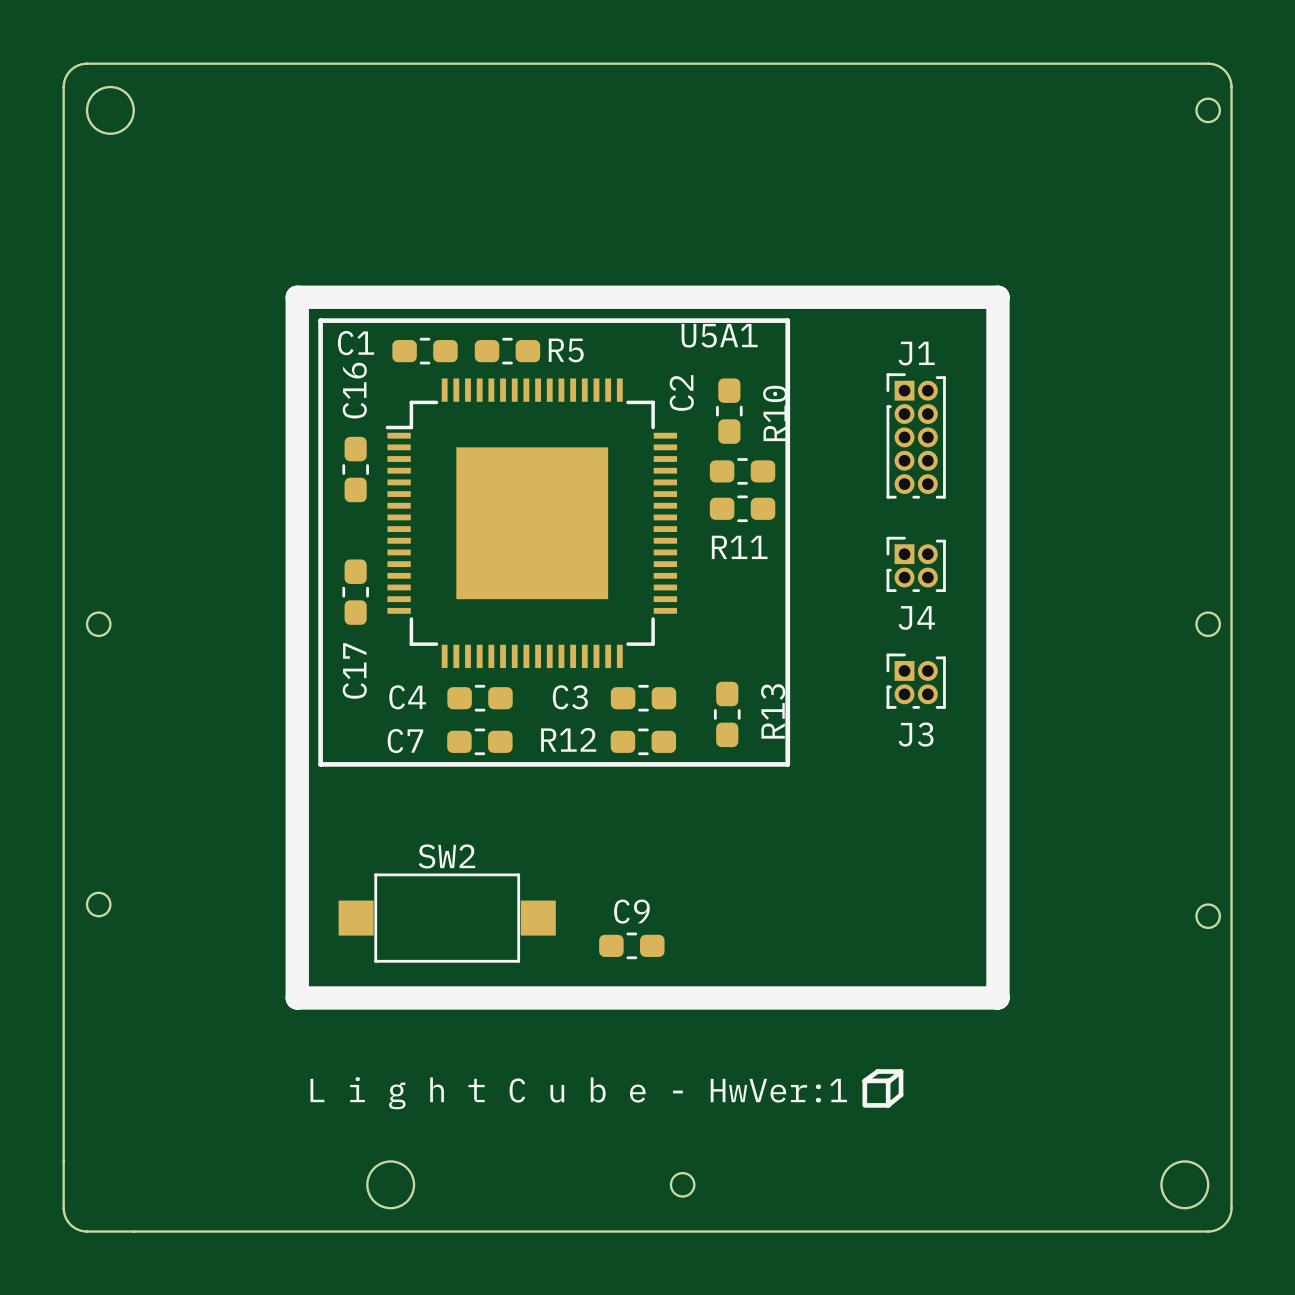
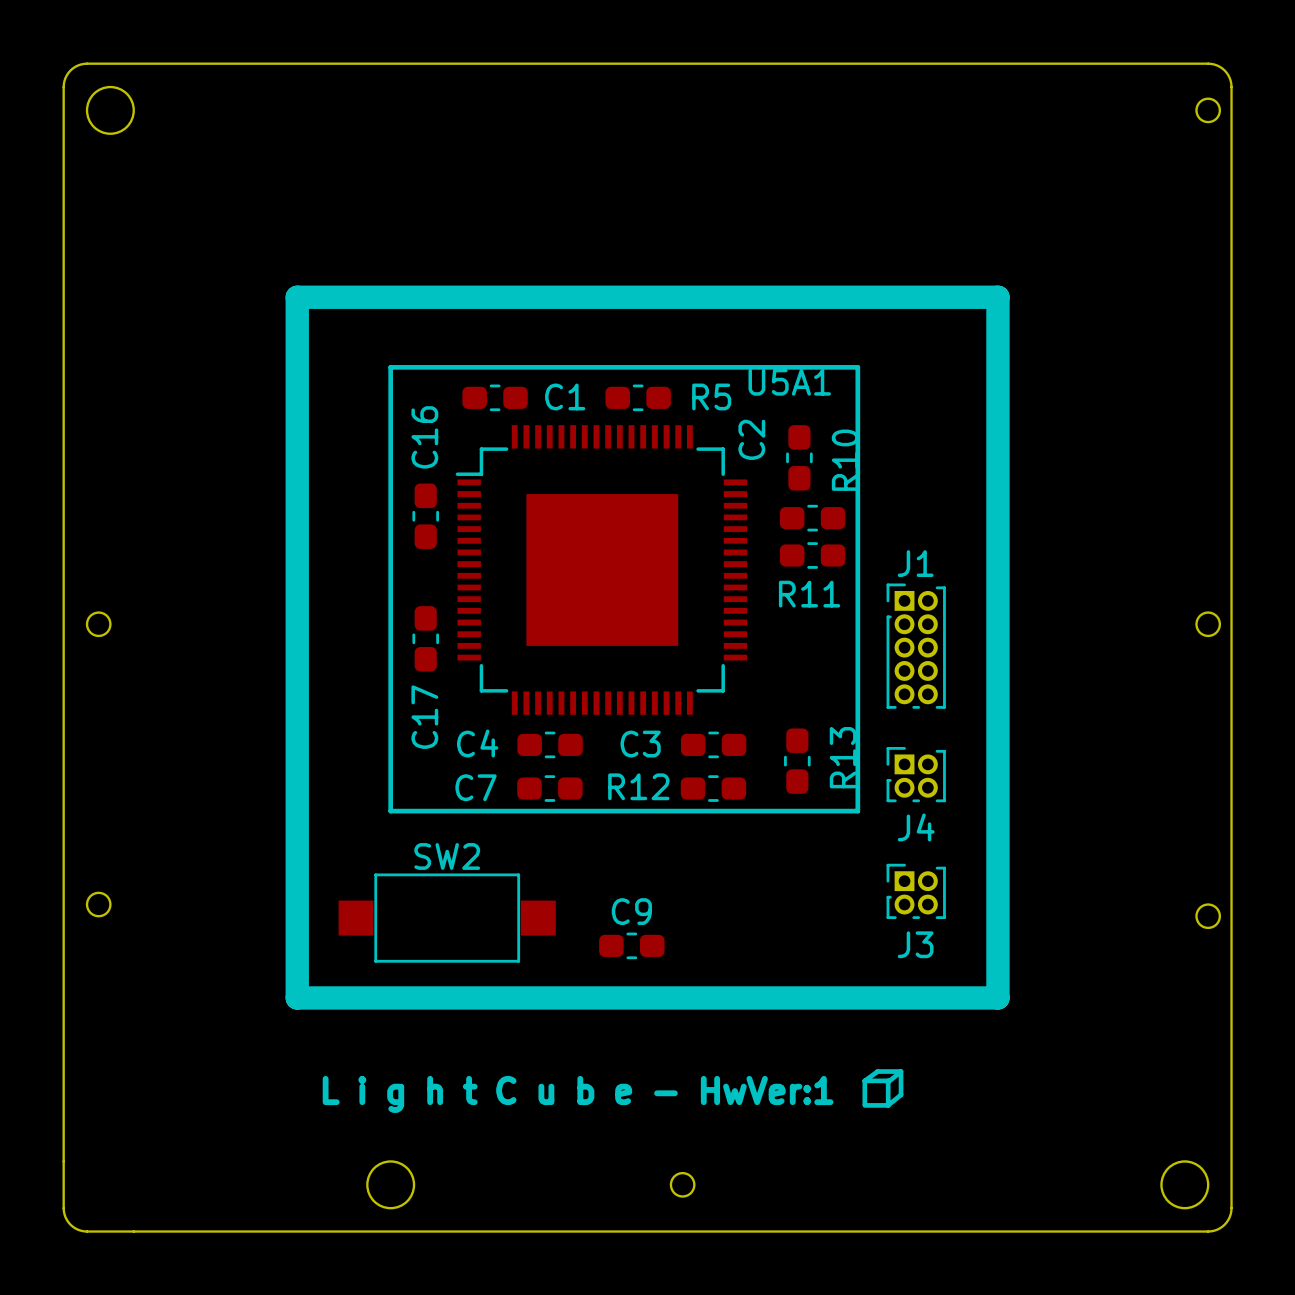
line: (320, 320) (787, 320) (787, 764) (320, 764) (320, 320) -> (390, 367) (857, 367) (857, 811) (390, 811) (390, 367)
C1 name position: C1 (356, 343) -> C1 (565, 396)
R5 name position: R5 (566, 350) -> R5 (711, 396)
C1 position: (425, 351) -> (495, 397)
R5 position: (507, 351) -> (638, 397)
C2 position: (729, 411) -> (799, 457)
J1 position: (916, 435) -> (916, 646)
C16 position: (355, 469) -> (425, 516)
R10 position: (742, 471) -> (812, 518)
R11 position: (742, 508) -> (812, 555)
U5A1 position: (531, 523) -> (601, 569)
J4 position: (916, 564) -> (916, 774)
C17 position: (355, 592) -> (425, 638)
J3 position: (916, 681) -> (916, 891)
C4 position: (480, 698) -> (550, 744)
C3 position: (643, 698) -> (713, 744)
R13 position: (727, 714) -> (797, 761)
C7 position: (479, 741) -> (549, 788)
R12 position: (643, 741) -> (713, 788)

